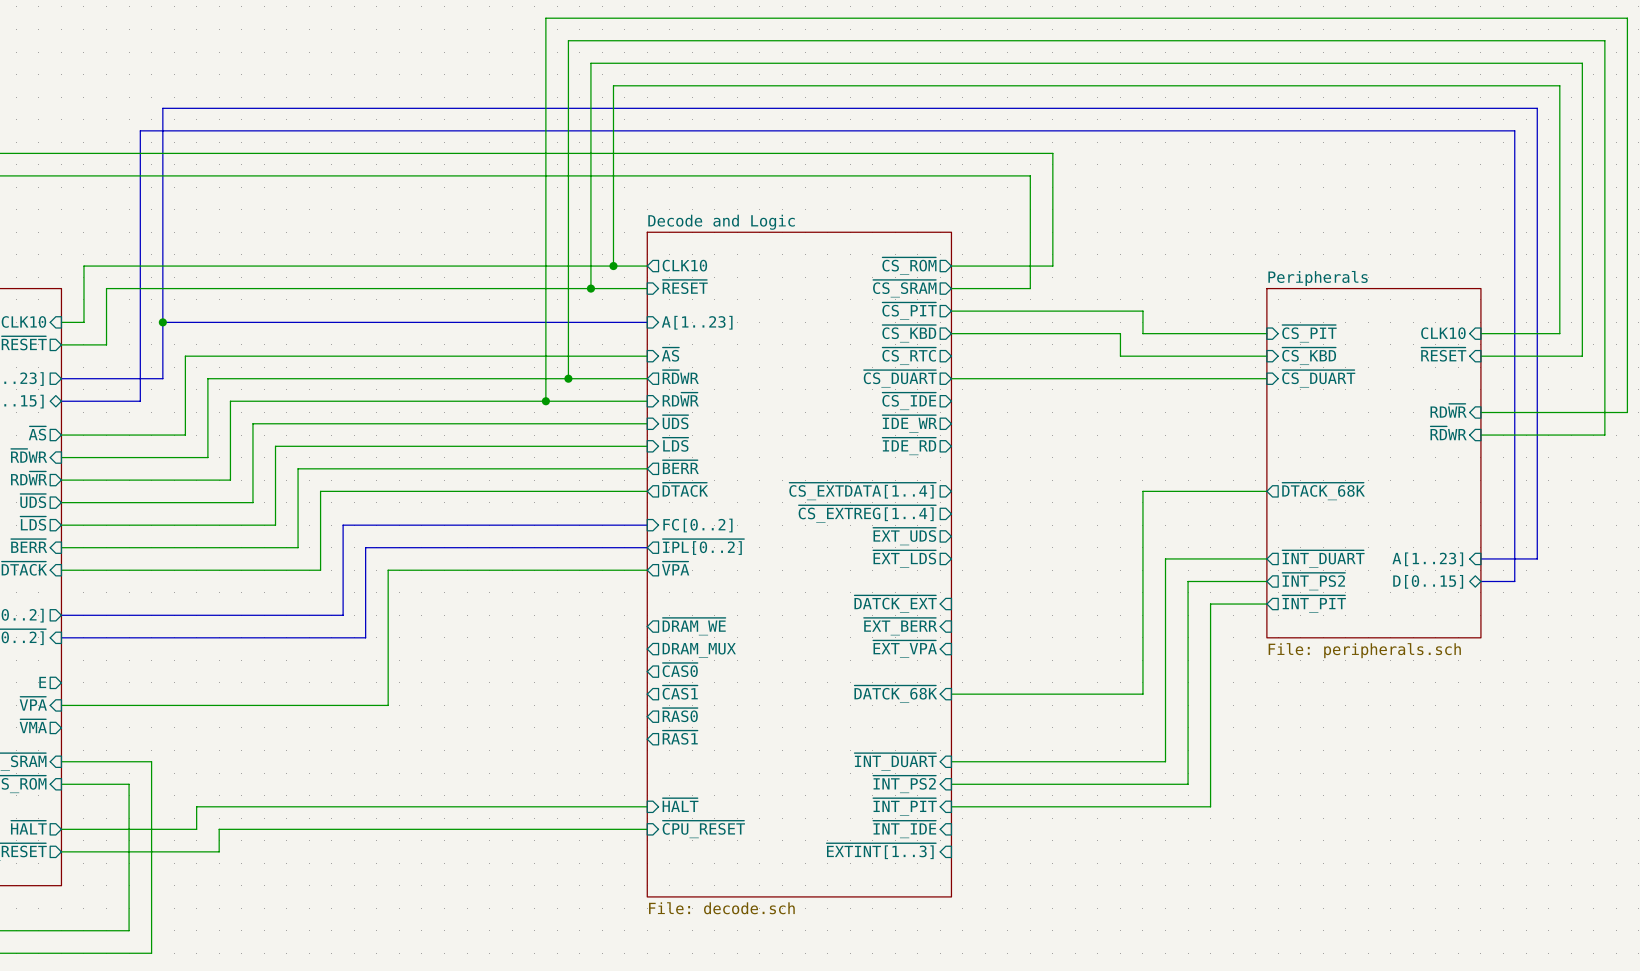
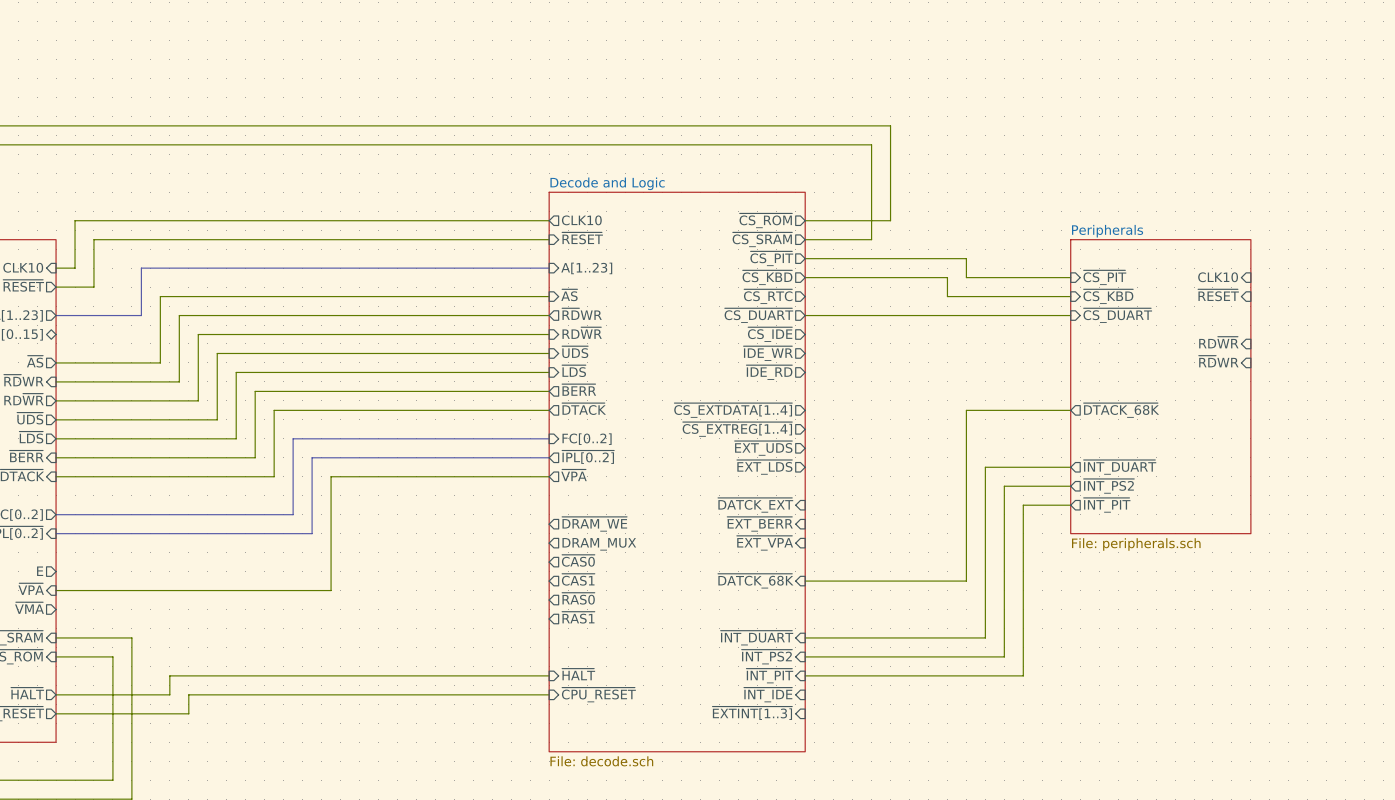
wire: (613, 266) (613, 85) (1559, 85) (1559, 333) (1480, 333) -> none
junction: (613, 266) -> none
wire: (590, 288) (590, 63) (1582, 63) (1582, 356) (1480, 356) -> none
junction: (590, 288) -> none
bus: (162, 322) (162, 108) (1537, 108) (1537, 558) (1480, 558) -> none
junction: (162, 322) -> none
wire: (568, 378) (568, 40) (1604, 40) (1604, 435) (1480, 435) -> none
junction: (568, 378) -> none
bus: (61, 401) (140, 401) (140, 130) (1514, 130) (1514, 581) (1480, 581) -> none
wire: (545, 401) (545, 18) (1627, 18) (1627, 412) (1480, 412) -> none
junction: (545, 401) -> none
sheet pin: A[1..23] (1427, 559) -> none
sheet pin: D[0..15] (1428, 581) -> none

